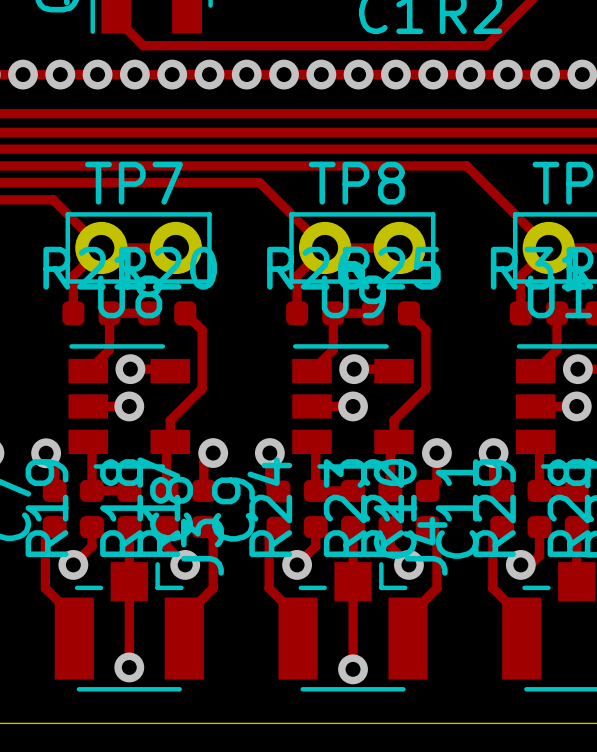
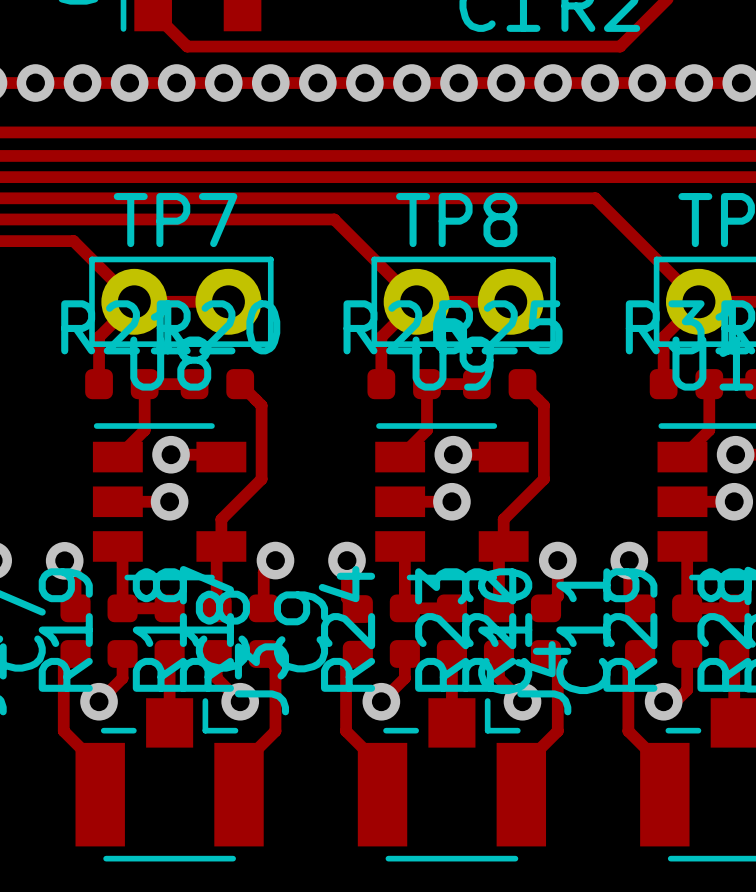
track: (129, 581) (129, 667) -> none
track: (353, 581) (353, 669) -> none
via: (129, 667) -> none
via: (353, 669) -> none

